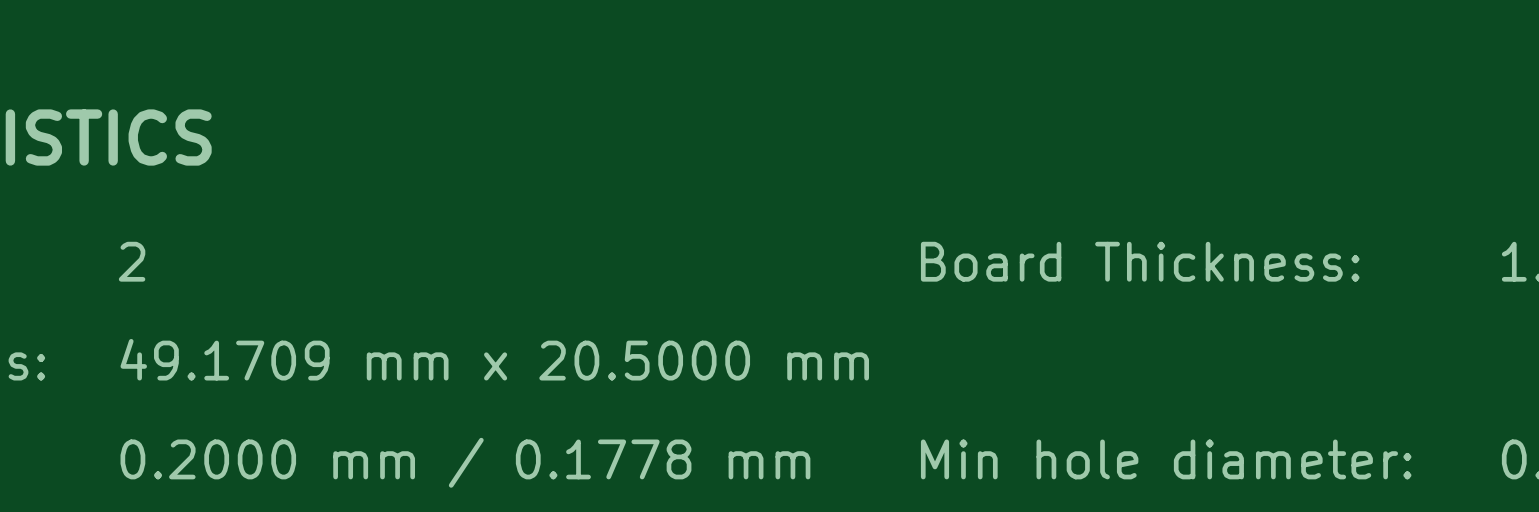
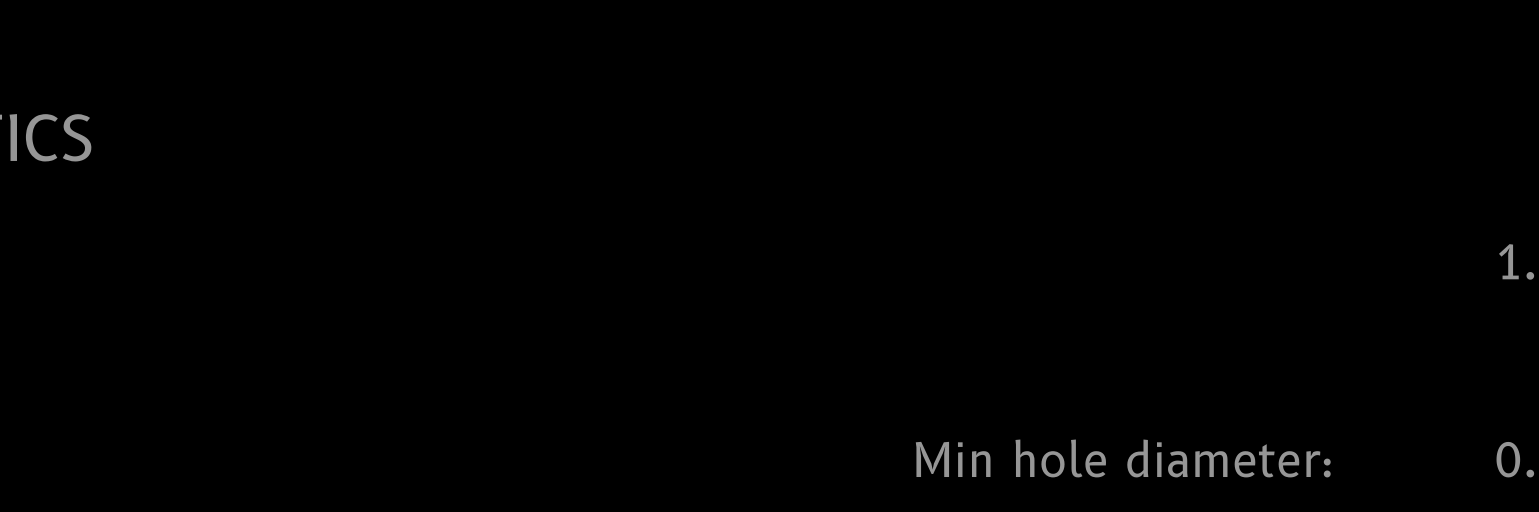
text: 2 (132, 261) -> none
text: Board Thickness: (1140, 261) -> none
text: 49.1709 mm x 20.5000 mm (494, 359) -> none
text: 0.2000 mm / 0.1778 mm (465, 462) -> none

